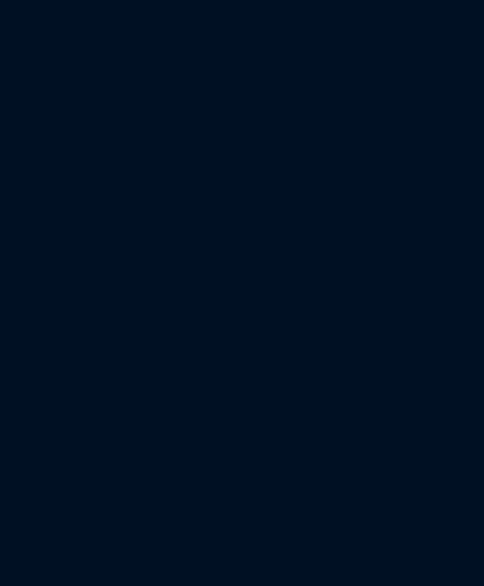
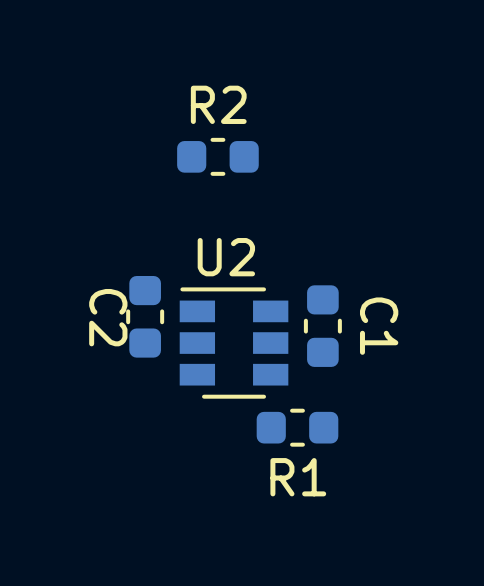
R2: none -> (217, 156)
C2: none -> (145, 316)
C1: none -> (322, 326)
U2: none -> (234, 343)
R1: none -> (297, 427)

